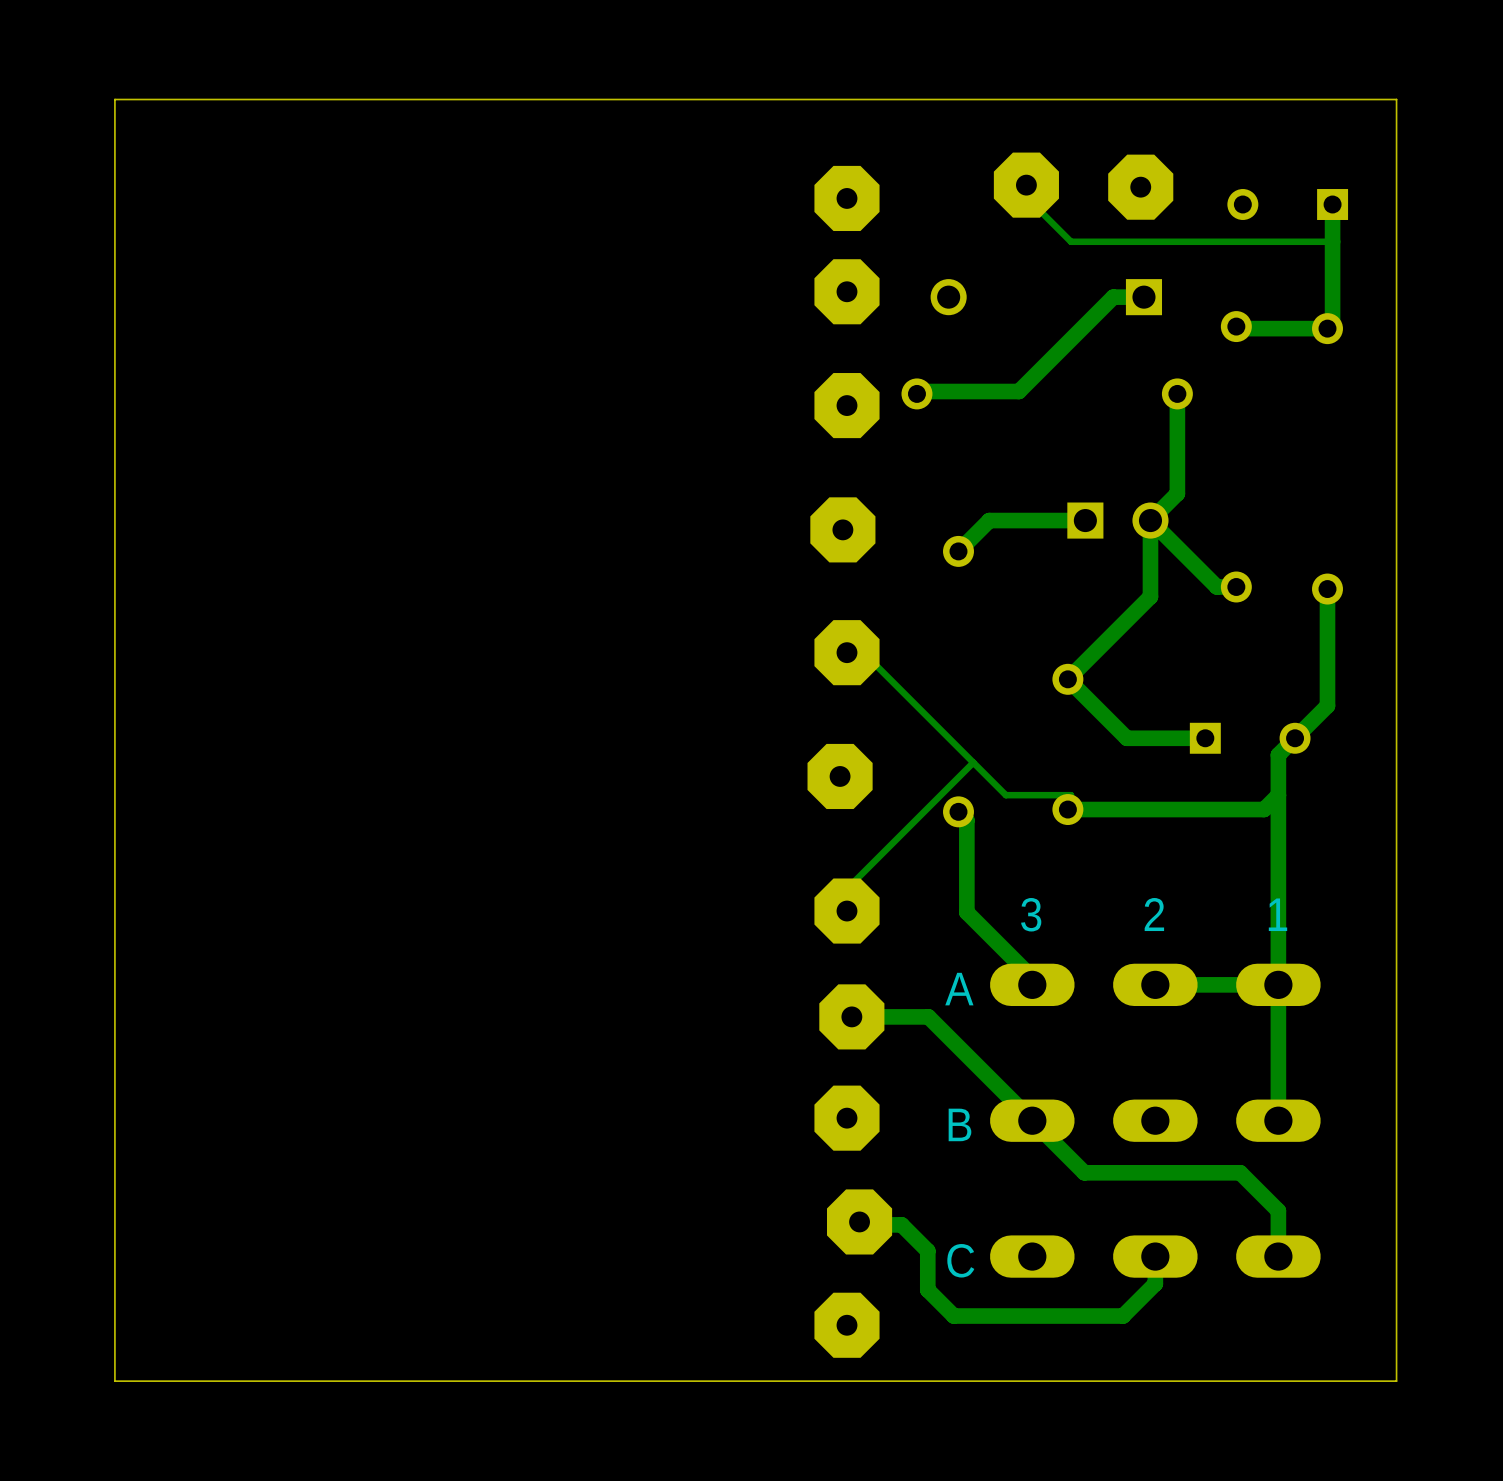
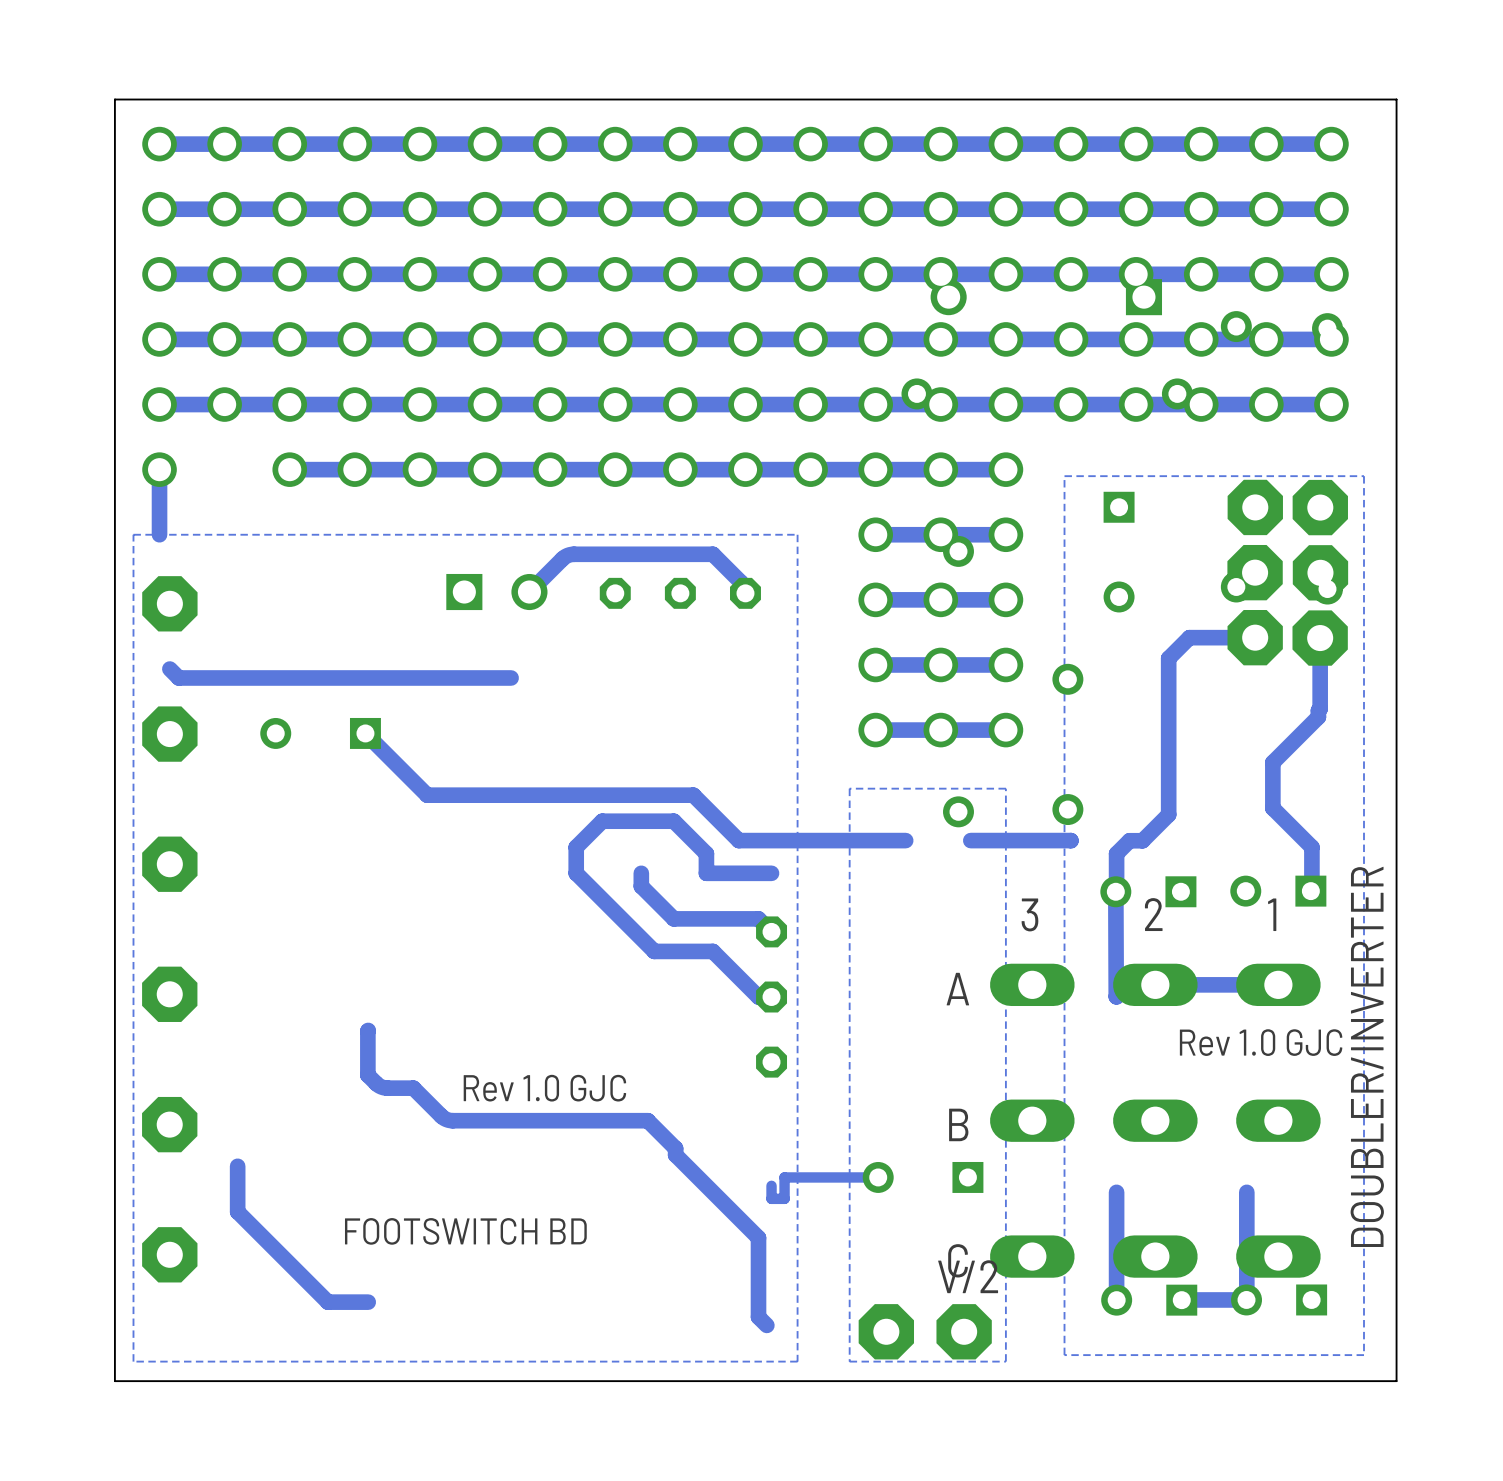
via: none -> (159, 144)
via: none -> (224, 144)
via: none -> (289, 144)
via: none -> (354, 144)
via: none -> (419, 144)
via: none -> (485, 144)
via: none -> (550, 144)
via: none -> (615, 144)
via: none -> (680, 144)
via: none -> (745, 144)
via: none -> (810, 144)
via: none -> (875, 144)
via: none -> (940, 144)
via: none -> (1005, 144)
via: none -> (1071, 144)
via: none -> (1136, 144)
via: none -> (1201, 144)
via: none -> (1266, 144)
track: none -> (1331, 144) (159, 144)
via: none -> (1331, 144)
track: (1026, 185) (1038, 209) (1071, 241) (1332, 241) -> none
part: (1026, 185) -> none
part: (1140, 187) -> none
part: (846, 198) -> none
part: (1287, 204) -> none
track: (1332, 204) (1332, 323) (1327, 328) (1238, 328) (1236, 326) -> none
via: none -> (159, 209)
via: none -> (224, 209)
via: none -> (289, 209)
via: none -> (354, 209)
via: none -> (419, 209)
via: none -> (485, 209)
via: none -> (550, 209)
via: none -> (615, 209)
via: none -> (680, 209)
via: none -> (745, 209)
via: none -> (810, 209)
via: none -> (875, 209)
via: none -> (940, 209)
via: none -> (1005, 209)
via: none -> (1071, 209)
via: none -> (1136, 209)
via: none -> (1201, 209)
via: none -> (1266, 209)
track: none -> (1331, 209) (159, 209)
via: none -> (1331, 209)
via: none -> (159, 274)
via: none -> (224, 274)
via: none -> (289, 274)
via: none -> (354, 274)
via: none -> (419, 274)
via: none -> (485, 274)
via: none -> (550, 274)
via: none -> (615, 274)
via: none -> (680, 274)
via: none -> (745, 274)
via: none -> (810, 274)
via: none -> (875, 274)
via: none -> (940, 274)
via: none -> (1005, 274)
via: none -> (1071, 274)
via: none -> (1136, 274)
via: none -> (1201, 274)
via: none -> (1266, 274)
track: none -> (1331, 274) (159, 274)
via: none -> (1331, 274)
part: (846, 291) -> none
track: (1143, 297) (1113, 297) (1018, 391) (919, 391) (916, 393) -> none
via: none -> (159, 339)
via: none -> (224, 339)
via: none -> (289, 339)
via: none -> (354, 339)
via: none -> (419, 339)
via: none -> (485, 339)
via: none -> (550, 339)
via: none -> (615, 339)
via: none -> (680, 339)
via: none -> (745, 339)
via: none -> (810, 339)
via: none -> (875, 339)
via: none -> (940, 339)
via: none -> (1005, 339)
via: none -> (1071, 339)
via: none -> (1136, 339)
via: none -> (1201, 339)
via: none -> (1266, 339)
track: none -> (1331, 339) (159, 339)
via: none -> (1331, 339)
track: (1177, 393) (1177, 493) (1150, 520) -> none
via: none -> (159, 404)
via: none -> (224, 404)
via: none -> (289, 404)
via: none -> (354, 404)
via: none -> (419, 404)
via: none -> (485, 404)
via: none -> (550, 404)
via: none -> (615, 404)
via: none -> (680, 404)
via: none -> (745, 404)
via: none -> (810, 404)
via: none -> (875, 404)
via: none -> (940, 404)
via: none -> (1005, 404)
via: none -> (1071, 404)
via: none -> (1136, 404)
via: none -> (1201, 404)
via: none -> (1266, 404)
track: none -> (1331, 404) (159, 404)
via: none -> (1331, 404)
part: (846, 405) -> none
track: none -> (159, 469) (159, 534)
via: none -> (159, 469)
via: none -> (289, 469)
via: none -> (354, 469)
via: none -> (419, 469)
via: none -> (485, 469)
via: none -> (550, 469)
via: none -> (615, 469)
via: none -> (680, 469)
via: none -> (745, 469)
via: none -> (810, 469)
via: none -> (875, 469)
via: none -> (940, 469)
track: none -> (1005, 469) (289, 469)
via: none -> (1005, 469)
zone outline: none -> (1364, 476) (1064, 476) (1064, 1355) (1364, 1355) (1364, 476)
part: none -> (1255, 507)
part: none -> (1320, 507)
track: (1085, 520) (989, 520) (958, 551) -> none
part position: (1117, 520) -> (496, 592)
track: (1150, 520) (1150, 596) (1067, 679) (1126, 738) (1205, 738) -> none
track: (1150, 520) (1216, 586) (1236, 586) -> none
part: (842, 529) -> none
zone outline: none -> (797, 534) (133, 534) (133, 1361) (797, 1361) (797, 534)
via: none -> (875, 534)
via: none -> (940, 534)
track: none -> (1005, 534) (875, 534)
via: none -> (1005, 534)
part: none -> (1119, 552)
part: none -> (1255, 572)
part: none -> (1320, 572)
track: (1327, 589) (1327, 705) (1278, 754) (1278, 1120) -> none
track: none -> (529, 592) (562, 559) (569, 554) (712, 554) (741, 583) (745, 593)
part: none -> (680, 593)
via: none -> (875, 599)
via: none -> (940, 599)
track: none -> (1005, 599) (875, 599)
via: none -> (1005, 599)
part: none -> (169, 603)
track: none -> (1255, 637) (1189, 637) (1168, 658) (1168, 814) (1142, 840) (1129, 840) (1116, 853) (1116, 996)
part: none -> (1255, 637)
track: none -> (1320, 638) (1320, 708) (1318, 717) (1272, 762) (1272, 808) (1311, 847) (1310, 891)
part: none -> (1320, 638)
track: (846, 652) (875, 664) (1005, 795) (1071, 795) (1067, 809) (1264, 809) (1278, 795) -> none
part: (846, 652) -> none
via: none -> (875, 664)
via: none -> (940, 664)
track: none -> (1005, 664) (875, 664)
via: none -> (1005, 664)
track: none -> (169, 669) (178, 677) (511, 677)
via: none -> (875, 730)
via: none -> (940, 730)
track: none -> (1005, 730) (875, 730)
via: none -> (1005, 730)
part: none -> (320, 733)
track: none -> (365, 733) (427, 795) (693, 795) (738, 840) (905, 840)
part: none -> (169, 734)
part: (1250, 738) -> none
track: (973, 762) (843, 892) (846, 911) -> none
part: (840, 776) -> none
zone outline: none -> (1005, 788) (1005, 1361) (849, 1361) (849, 788) (1005, 788)
track: (958, 811) (966, 820) (966, 912) (1032, 977) (1032, 984) -> none
track: none -> (1070, 840) (970, 840)
part: none -> (169, 864)
track: none -> (641, 873) (641, 886) (673, 918) (758, 918) (771, 931)
track: none -> (771, 873) (706, 873) (706, 853) (673, 821) (602, 821) (576, 847) (576, 873) (654, 951) (712, 951) (758, 997) (771, 997)
part: none -> (1148, 891)
part: none -> (1278, 891)
part: (846, 911) -> none
part: none -> (169, 994)
part: none -> (771, 997)
track: (851, 1016) (928, 1016) (1084, 1172) (1240, 1172) (1278, 1210) (1278, 1256) -> none
part: (851, 1016) -> none
track: none -> (368, 1030) (367, 1075) (383, 1087) (413, 1088) (441, 1115) (448, 1120) (647, 1120) (675, 1148) (675, 1155) (758, 1237) (758, 1317) (766, 1325)
text: none -> DOUBLER/INVERTER (1367, 1056)
text: none -> Rev 1.0 GJC (1261, 1042)
text: none -> Rev 1.0 GJC (544, 1088)
part: (846, 1118) -> none
part: none -> (169, 1124)
track: none -> (237, 1166) (237, 1211) (327, 1302) (368, 1302)
track: none -> (878, 1177) (784, 1177) (784, 1198) (771, 1198) (771, 1185)
part: none -> (923, 1177)
track: none -> (1116, 1192) (1116, 1299)
track: none -> (1246, 1192) (1246, 1299)
track: (859, 1221) (862, 1224) (901, 1224) (927, 1250) (927, 1289) (953, 1316) (1123, 1316) (1155, 1283) (1155, 1256) -> none
part: (859, 1221) -> none
text: none -> FOOTSWITCH BD (465, 1231)
part: none -> (169, 1254)
track: none -> (1246, 1299) (1181, 1299)
part: none -> (1279, 1299)
part: none -> (1149, 1300)
part: (846, 1325) -> none
part: none -> (886, 1331)
V/2: none -> (964, 1331)

